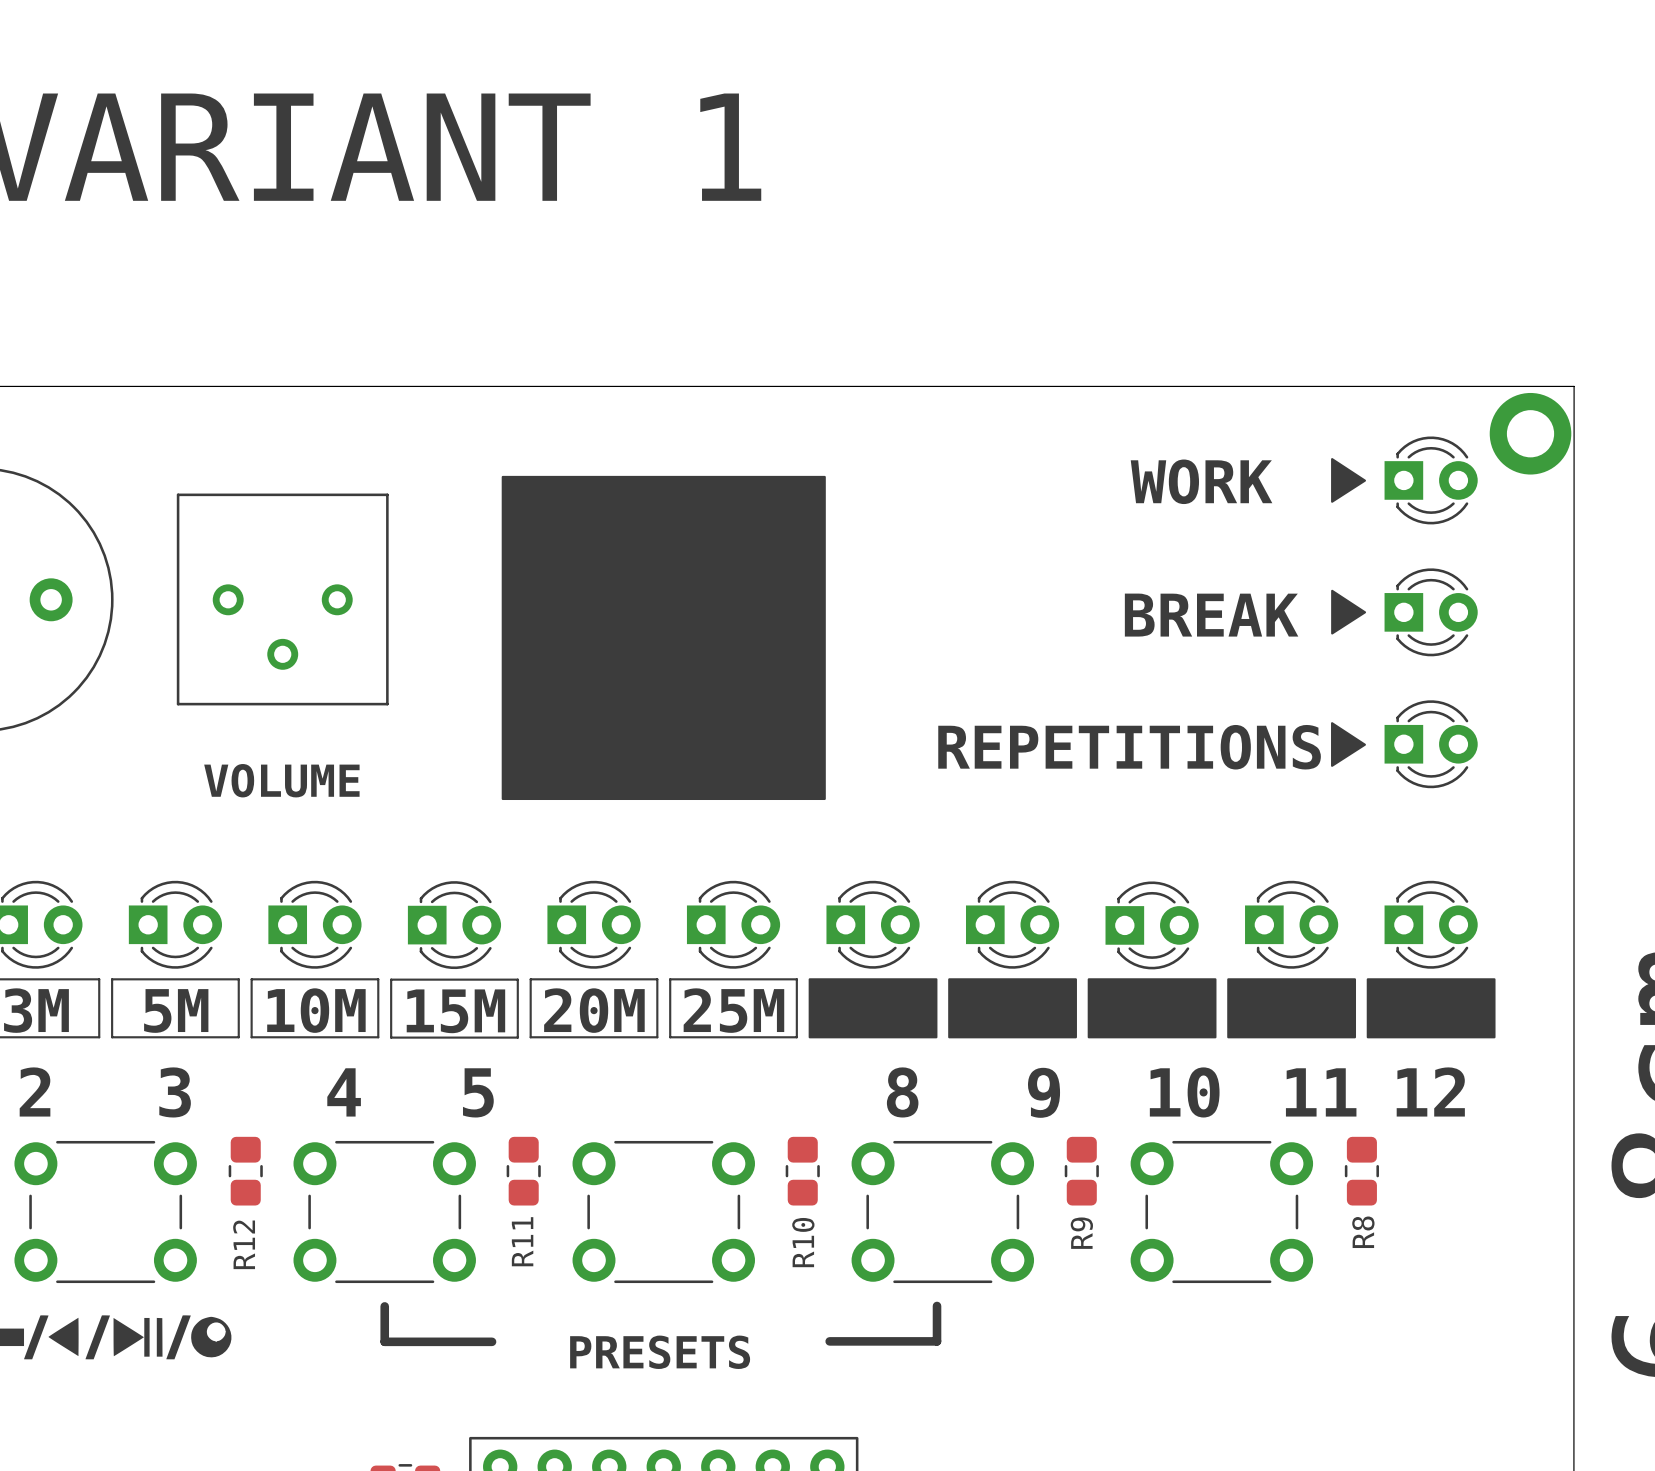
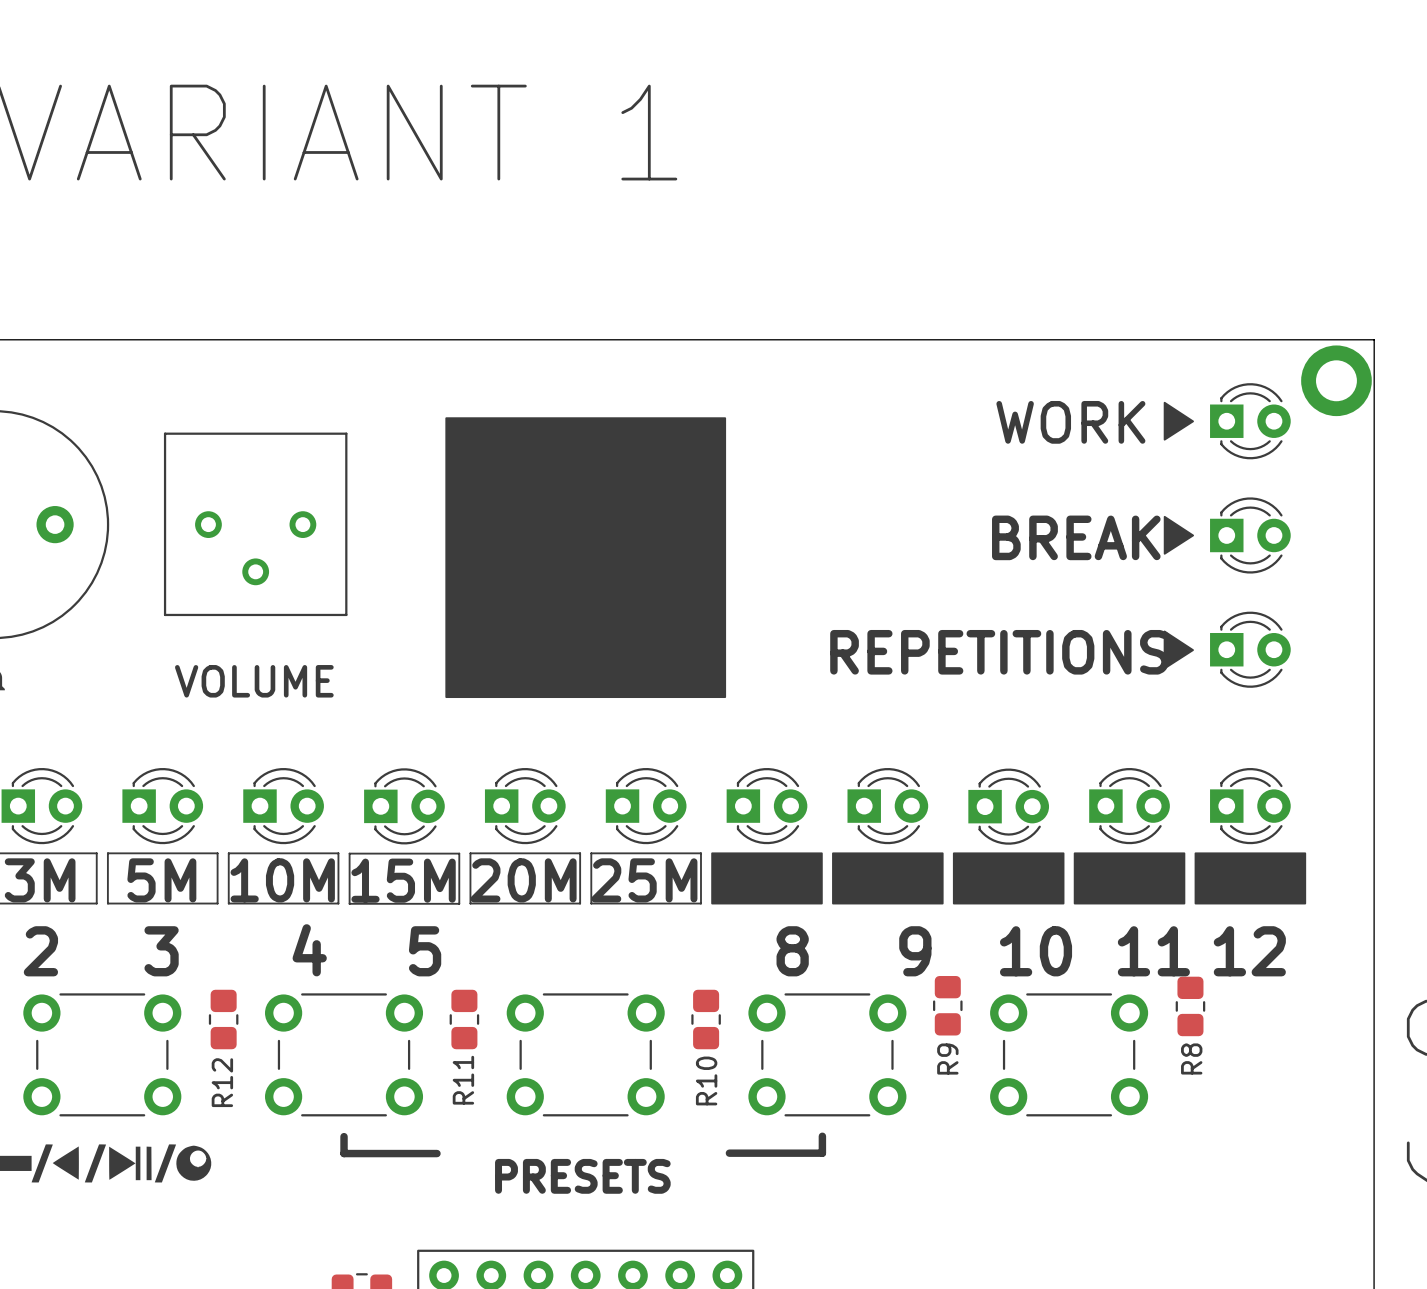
R9 position: (1081, 1171) -> (947, 1005)
R8 position: (1361, 1171) -> (1190, 1006)
line: (384, 1325) (384, 1341) (492, 1341) -> (344, 1153) (436, 1153)
line: (937, 1325) (937, 1341) (829, 1341) -> (822, 1153) (729, 1153)

